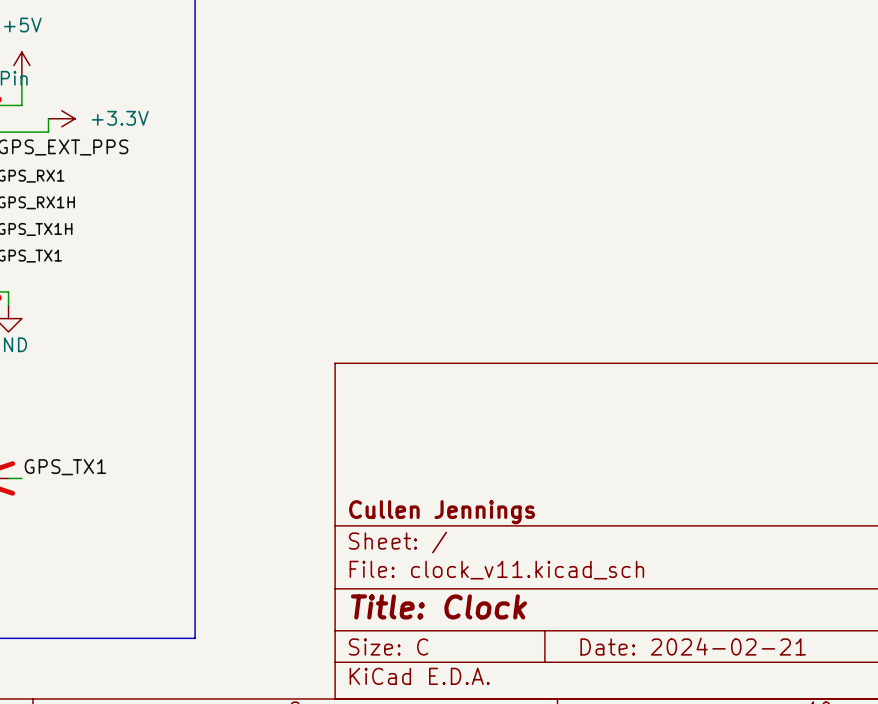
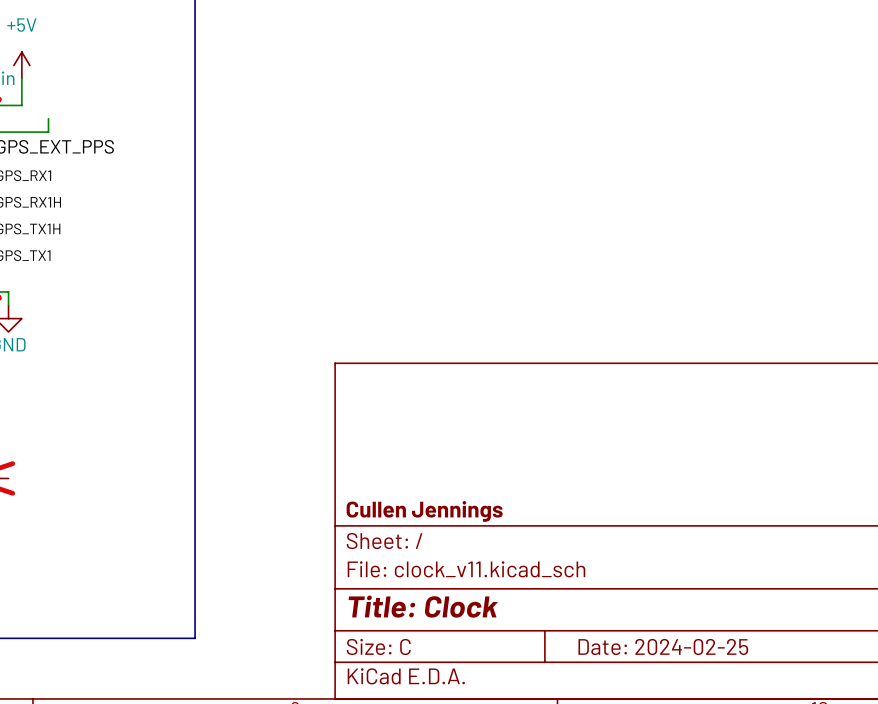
power symbol: +3.3V (61, 118) -> none
label: GPS_TX1 (65, 467) -> none
wire: (8, 478) (21, 478) -> none
title block: Date: 2024-02-21 (693, 646) -> Date: 2024-02-25 (663, 647)

